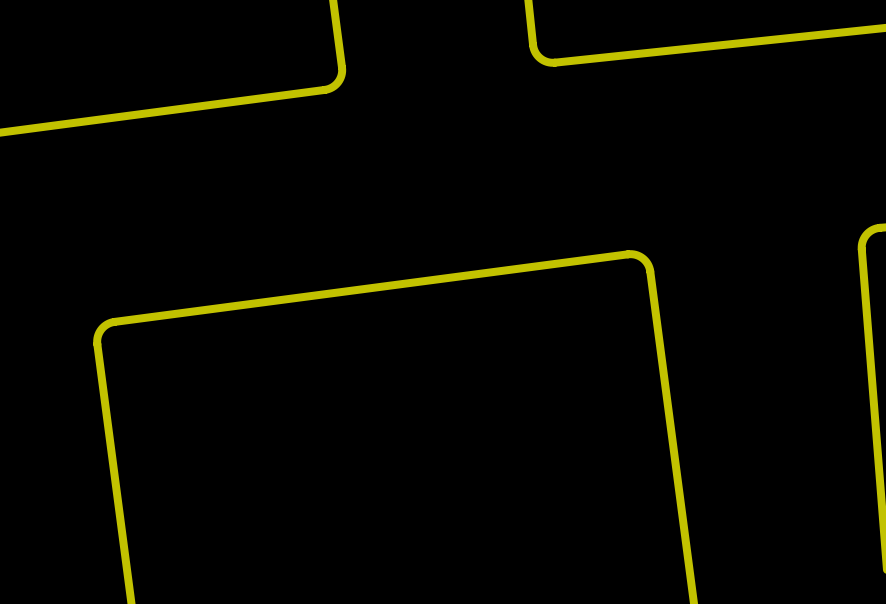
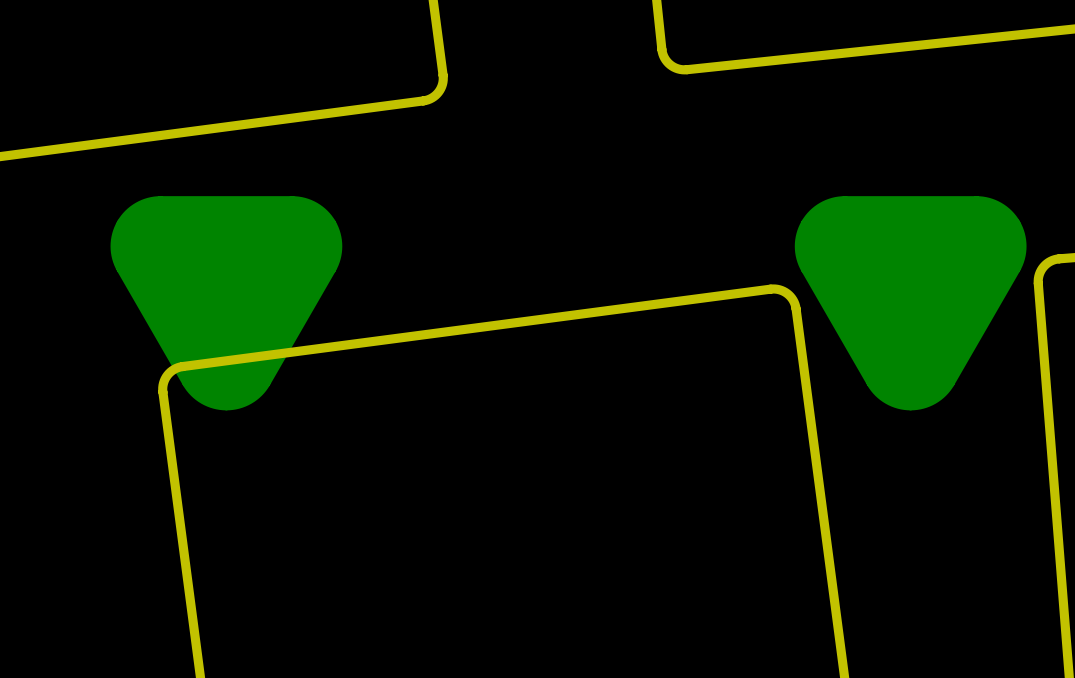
drawing: none -> [115, 200, 338, 406]
track: none -> (292, 200) (154, 201) (143, 204) (133, 210) (124, 218) (118, 228) (115, 249) (119, 266) (188, 385) (196, 394) (208, 402) (223, 405) (235, 404) (249, 399) (260, 390) (334, 263) (337, 252) (337, 240) (330, 220) (322, 211) (312, 205) (292, 200)
drawing: none -> [799, 200, 1022, 406]
track: none -> (976, 200) (838, 201) (827, 204) (817, 210) (808, 218) (802, 228) (799, 249) (804, 266) (872, 385) (880, 394) (893, 402) (907, 405) (919, 404) (933, 399) (944, 390) (1018, 263) (1021, 252) (1021, 240) (1014, 220) (1006, 211) (996, 205) (976, 200)

